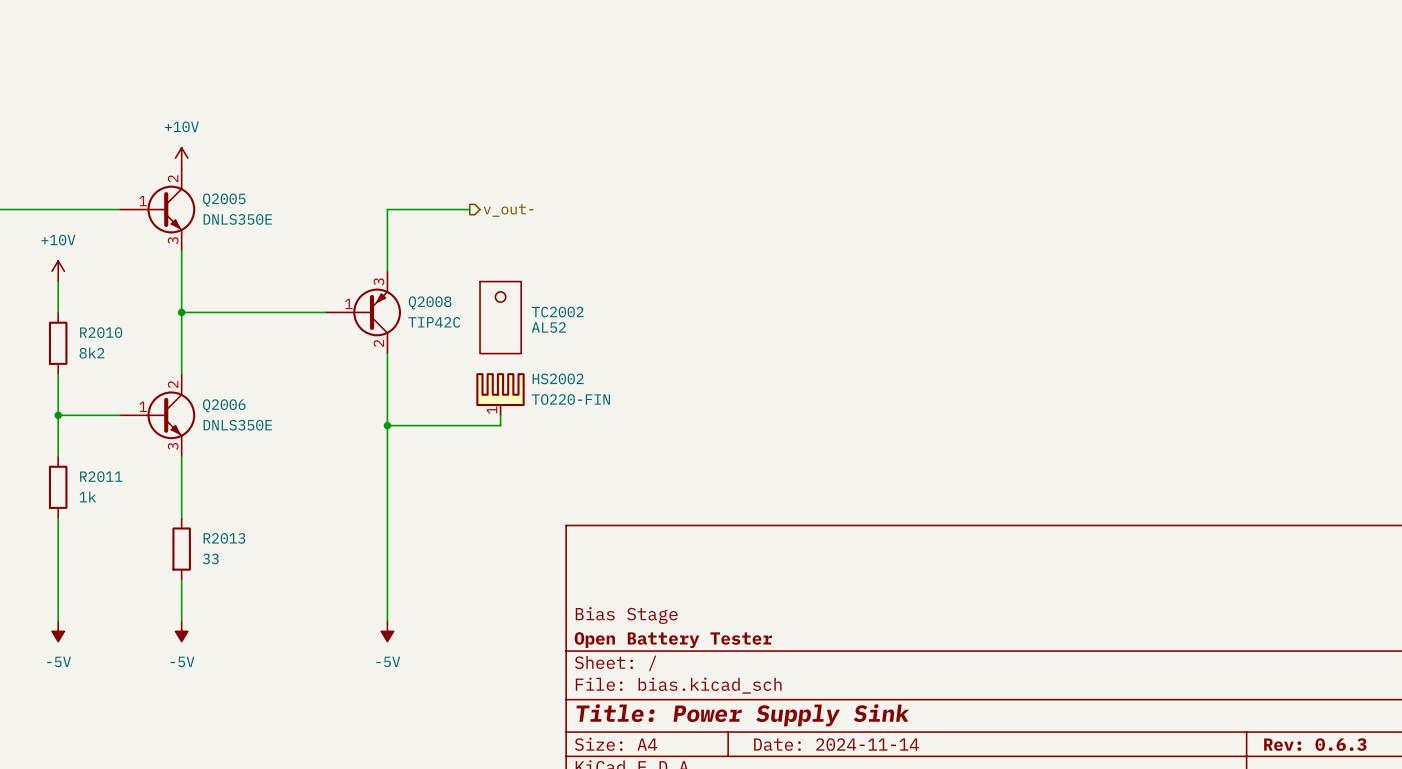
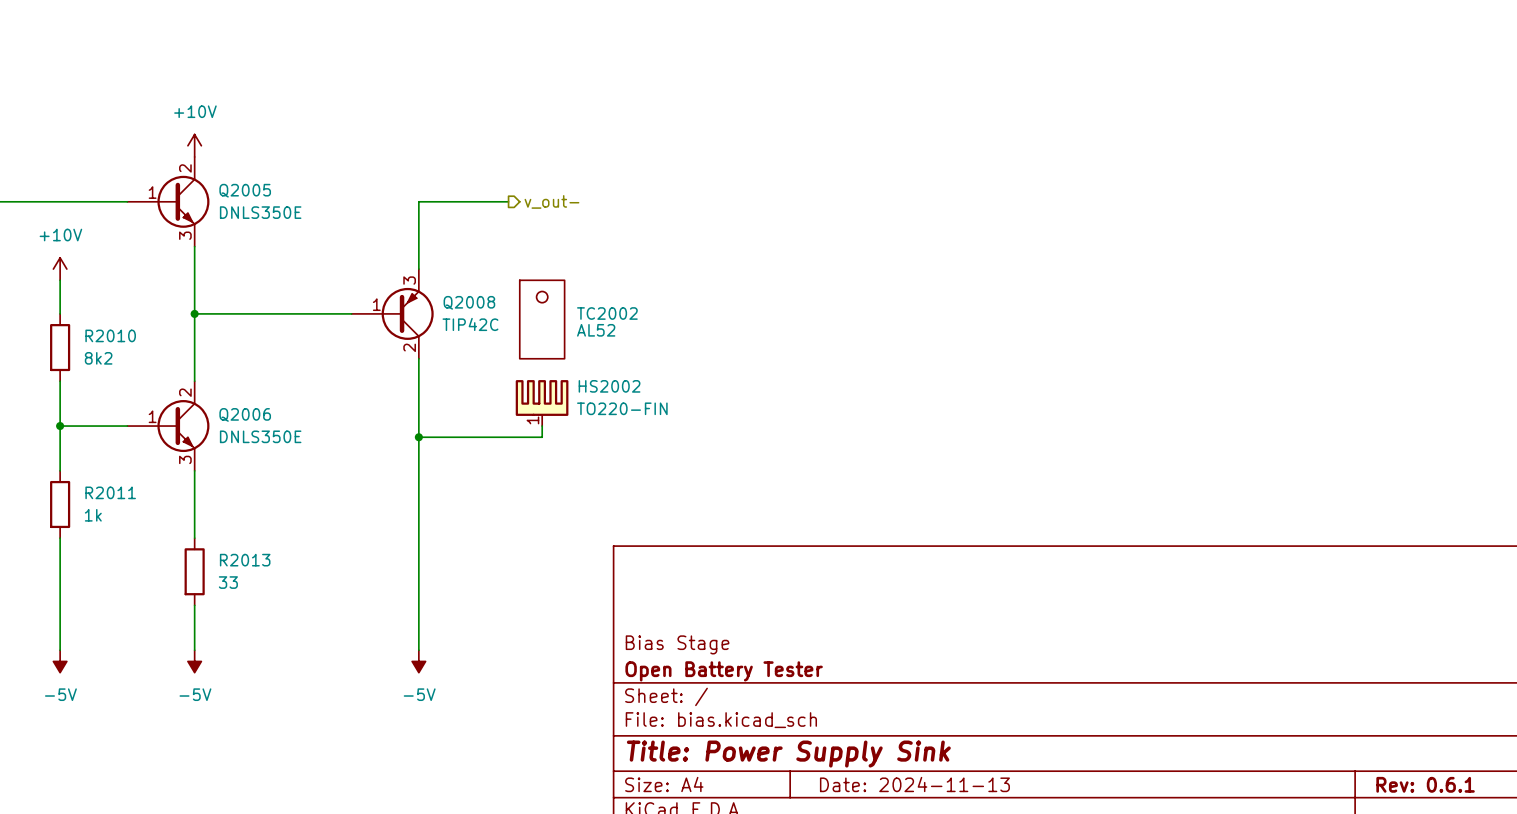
title block: Date: 2024-11-14 (836, 744) -> Date: 2024-11-13 (914, 784)
title block: Rev: 0.6.3 (1315, 744) -> Rev: 0.6.1 (1425, 784)

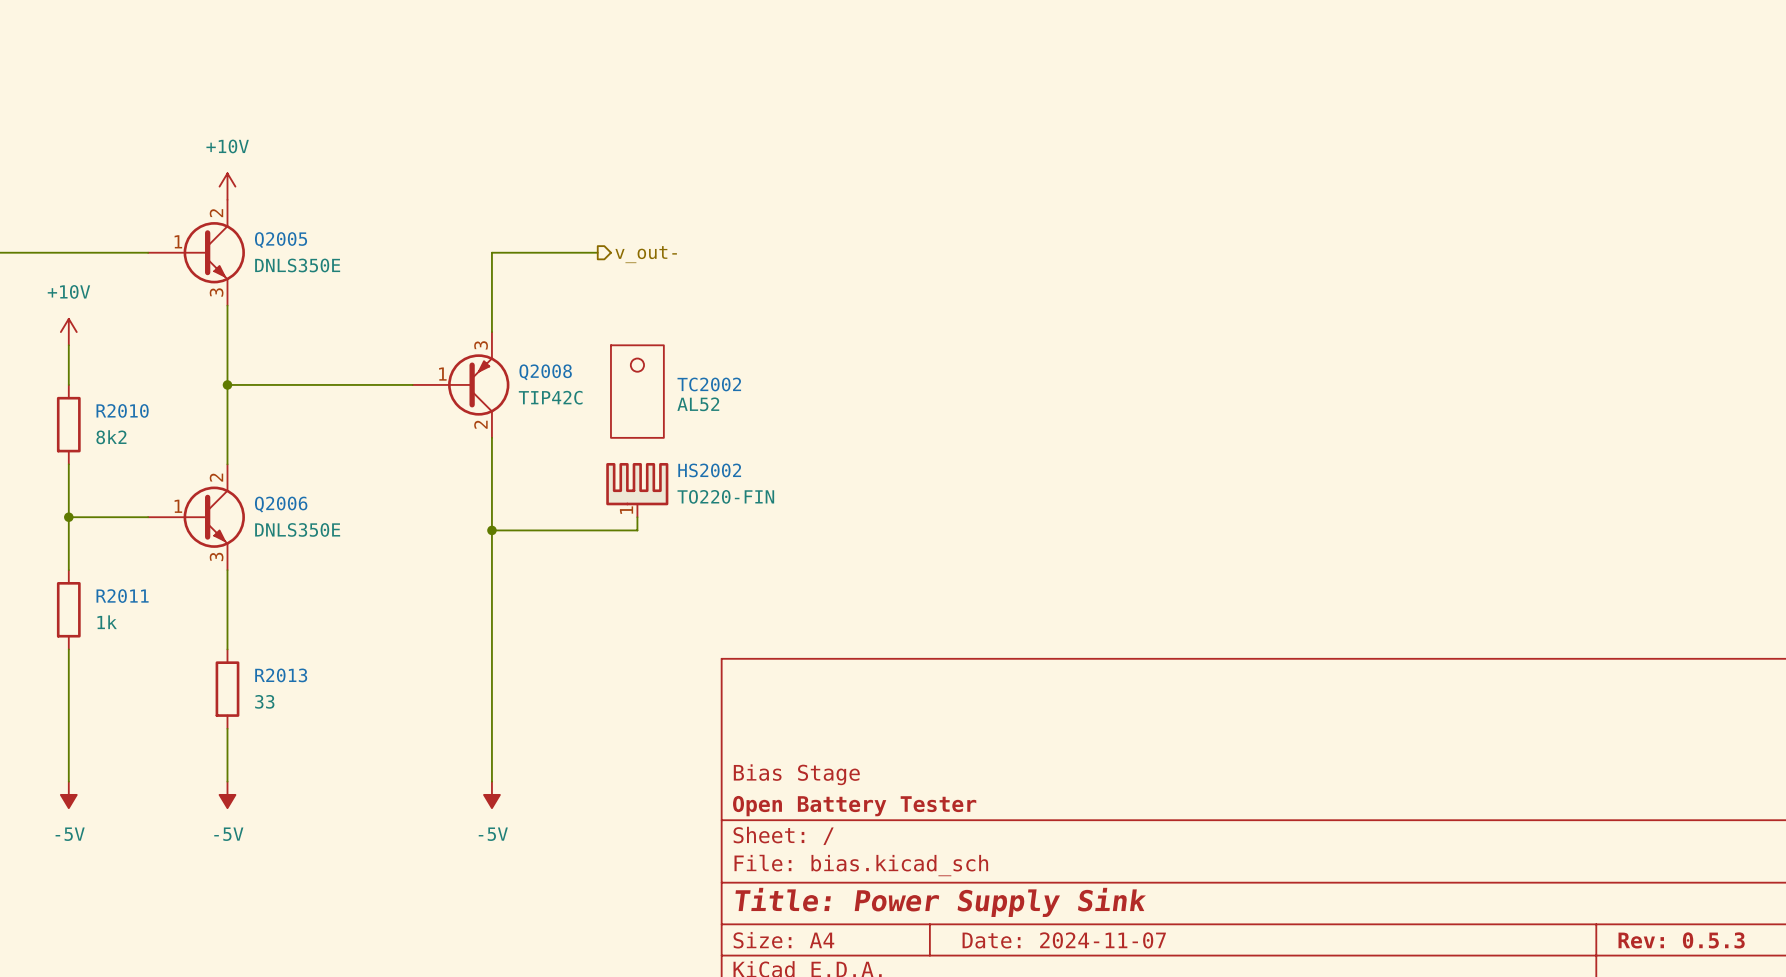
title block: Date: 2024-11-13 (914, 784) -> Date: 2024-11-07 (1064, 940)
title block: Rev: 0.6.1 (1425, 784) -> Rev: 0.5.3 (1681, 940)

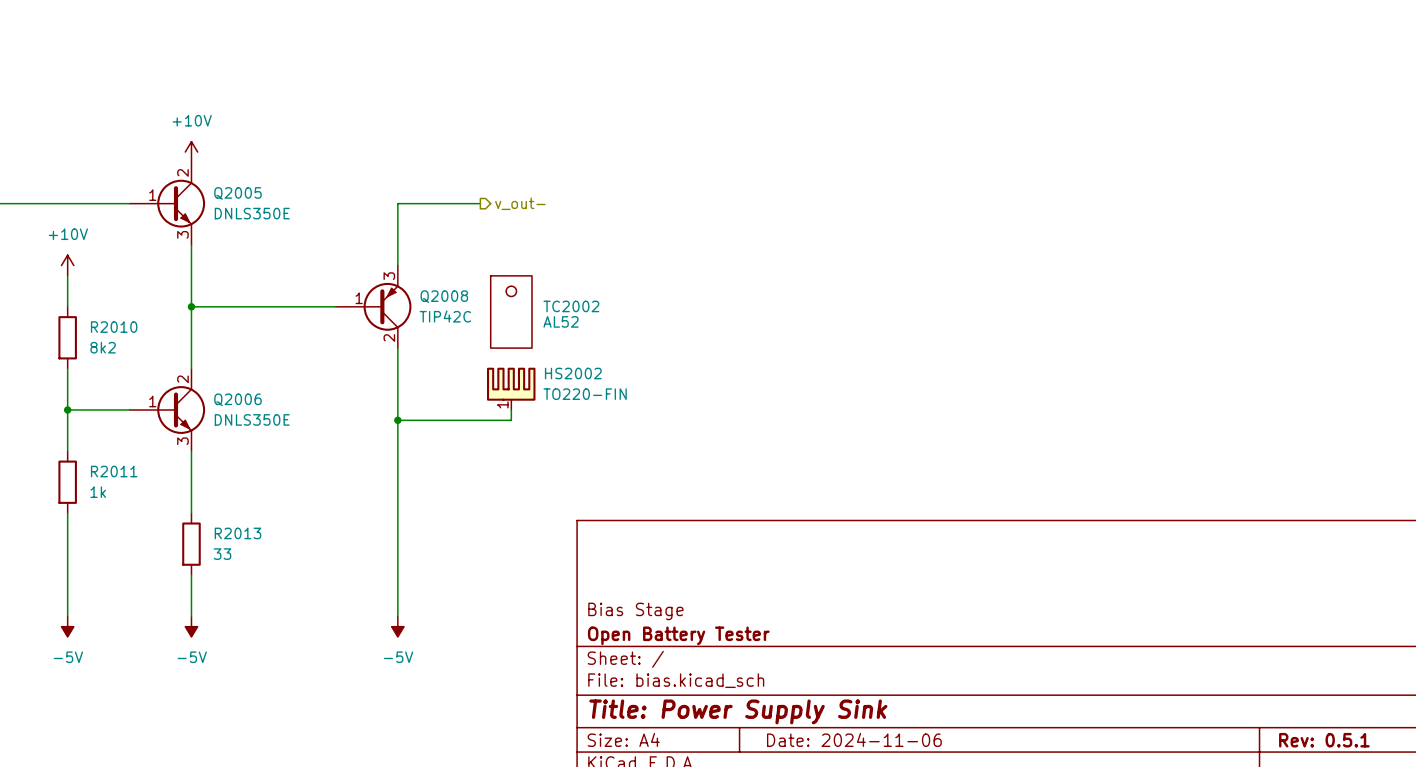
title block: Date: 2024-11-07 (1064, 940) -> Date: 2024-11-06 (854, 739)
title block: Rev: 0.5.3 (1681, 940) -> Rev: 0.5.1 (1324, 740)

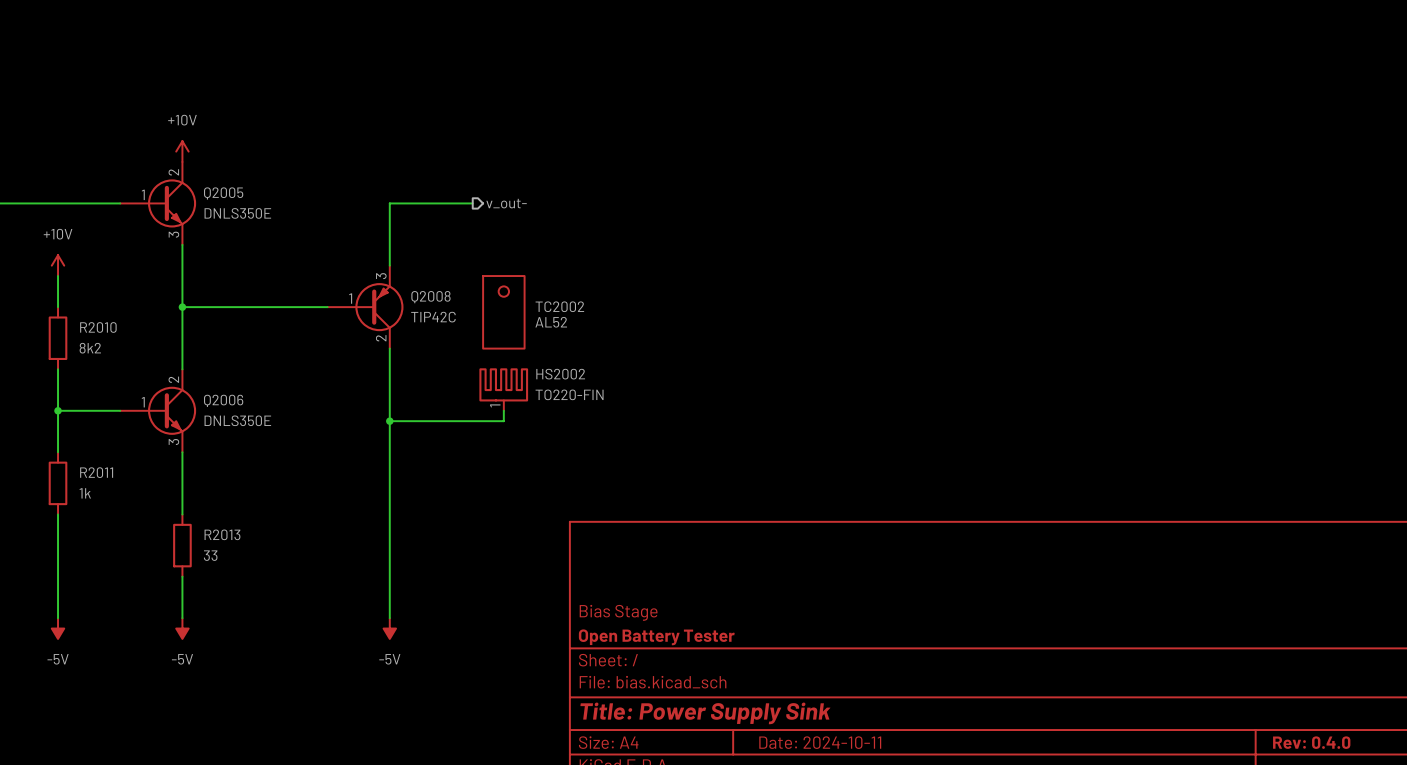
title block: Date: 2024-11-06 (854, 739) -> Date: 2024-10-11 (820, 742)
title block: Rev: 0.5.1 (1324, 740) -> Rev: 0.4.0 (1311, 742)

